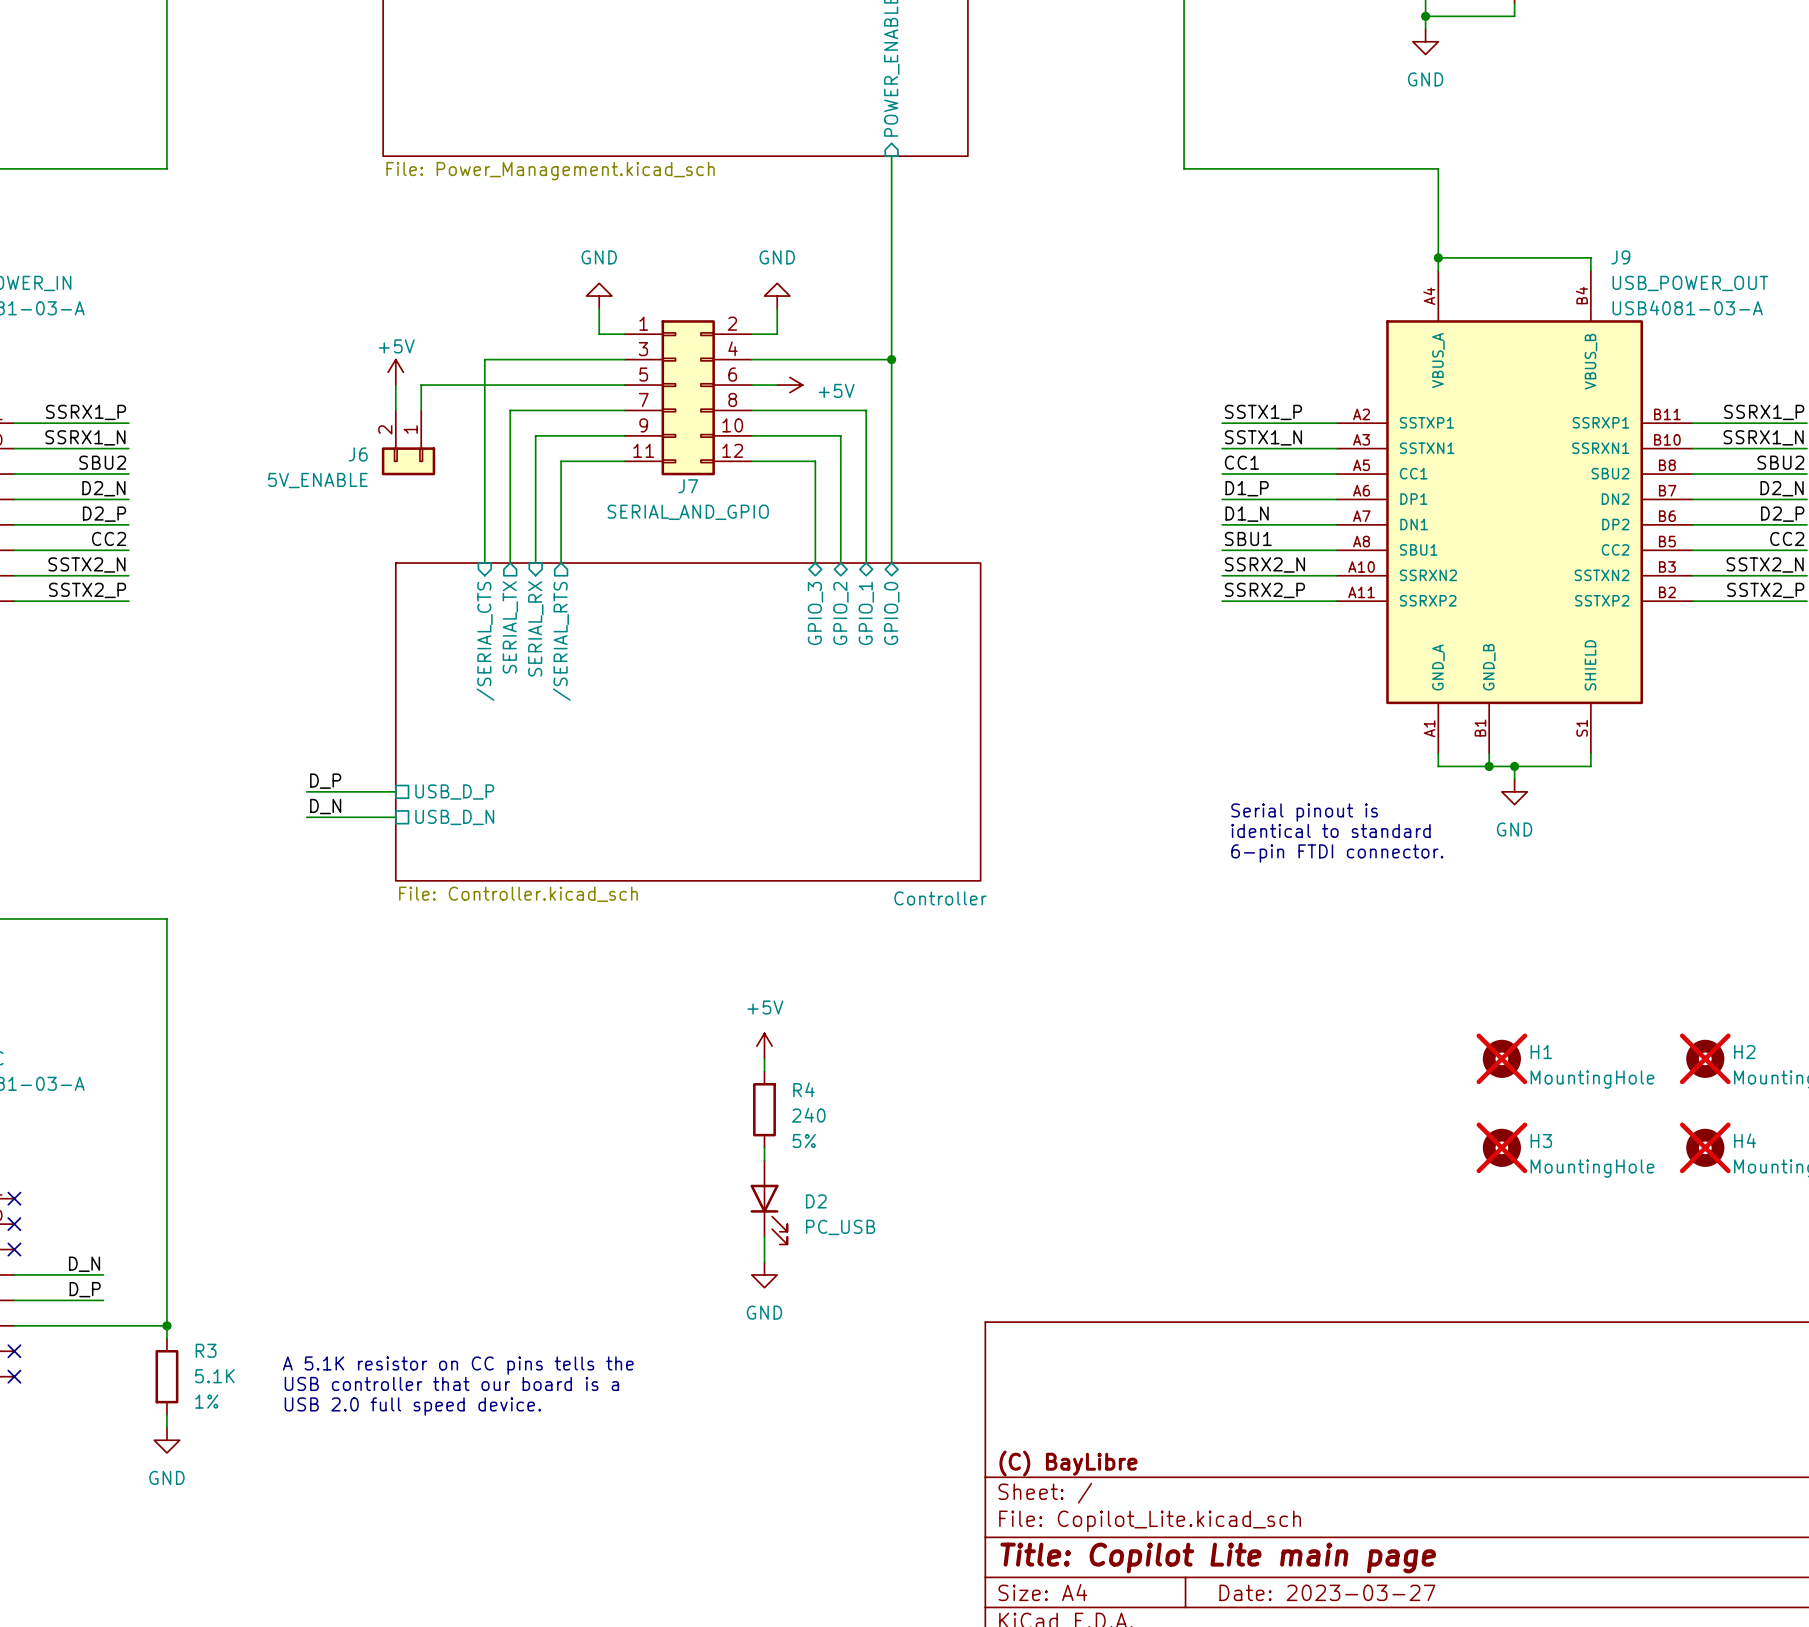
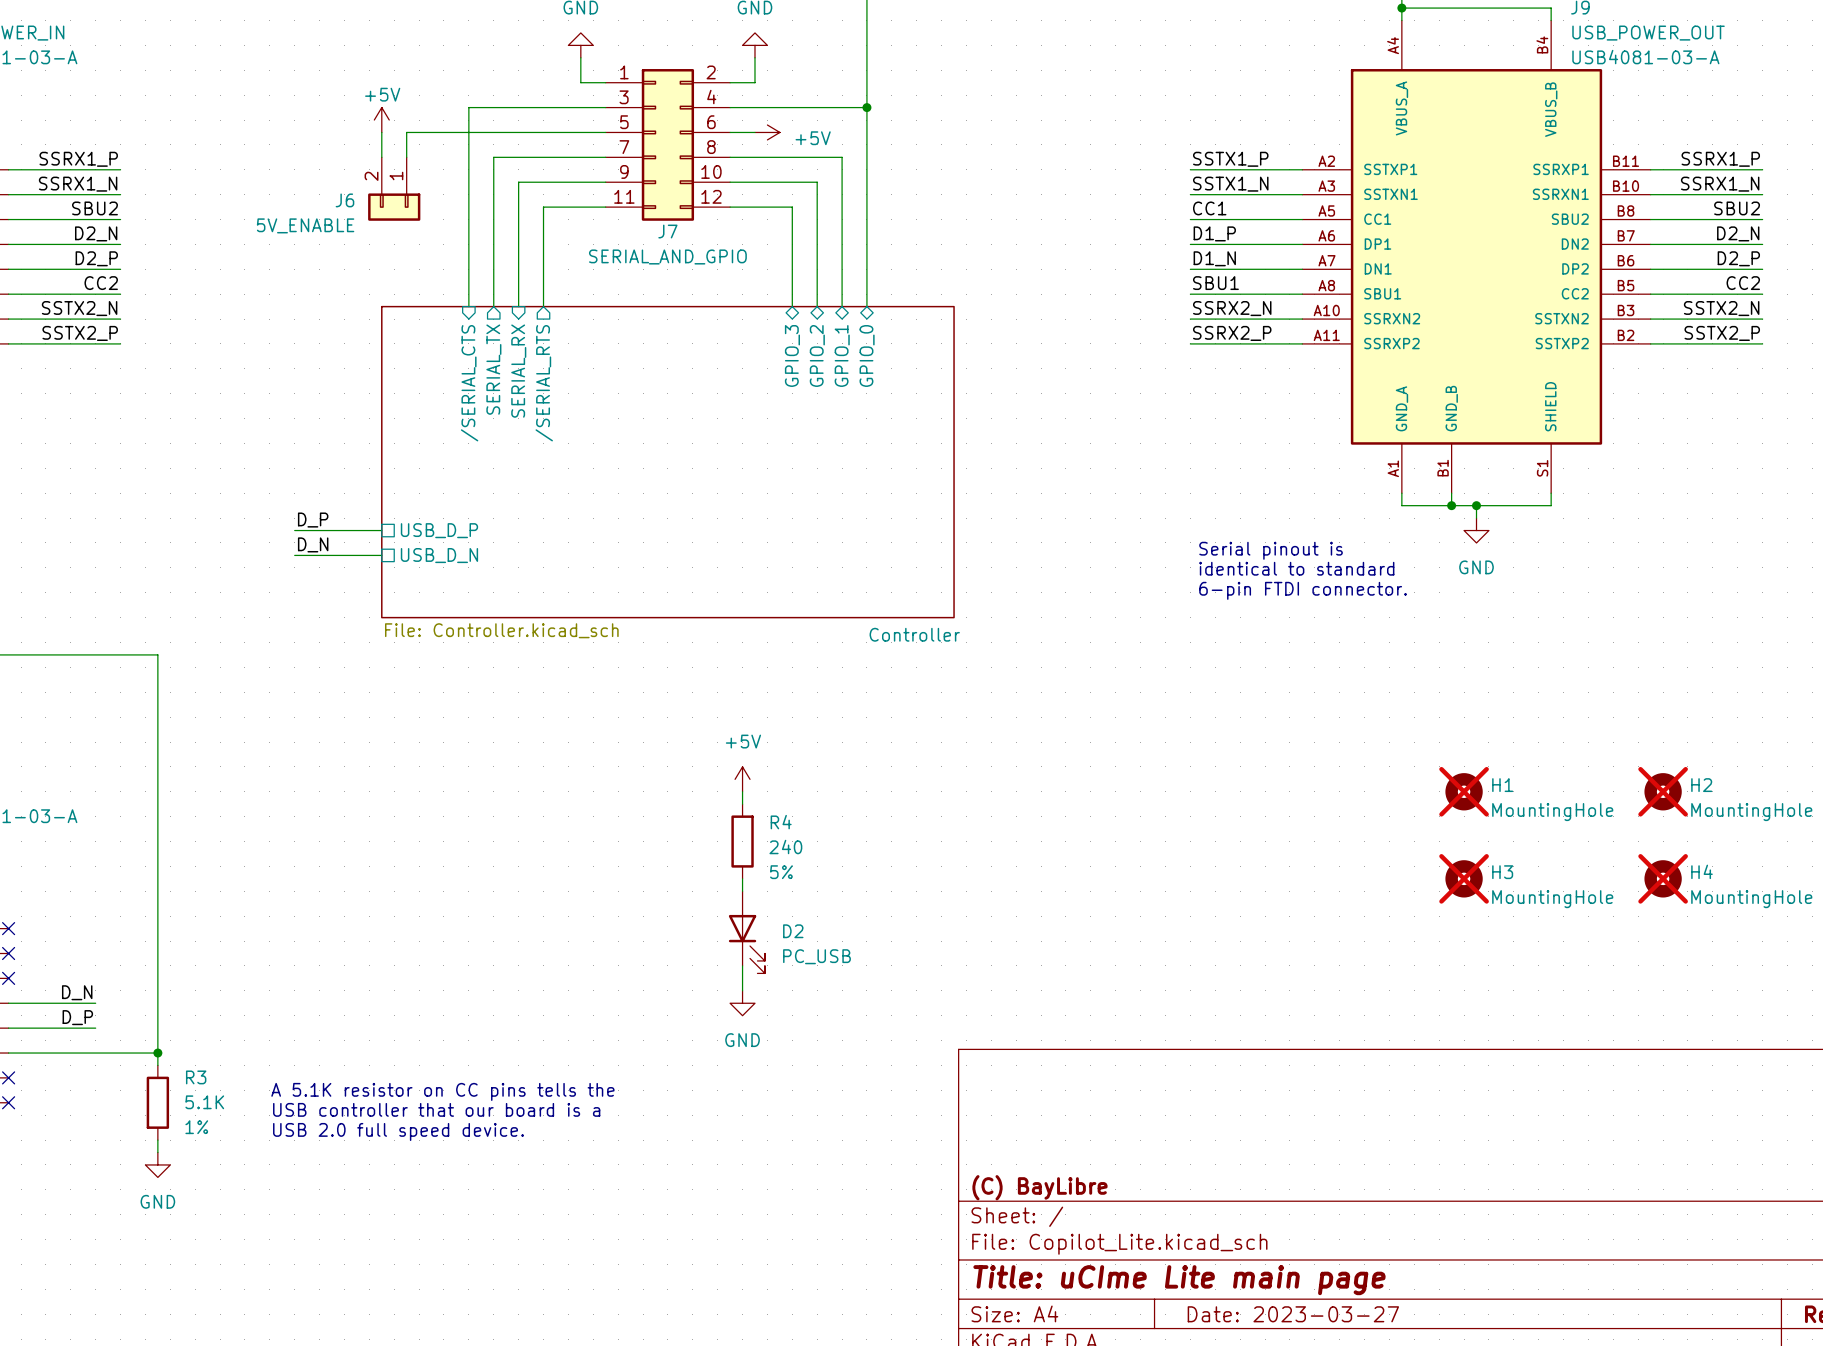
title block: Title: Copilot Lite main page (1218, 1557) -> Title: uCIme Lite main page (1179, 1280)

